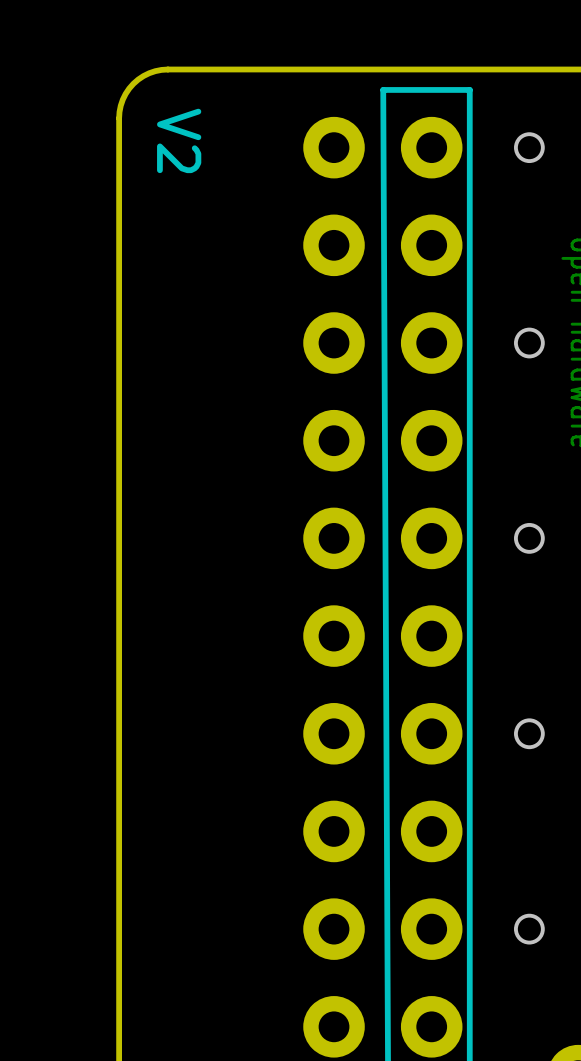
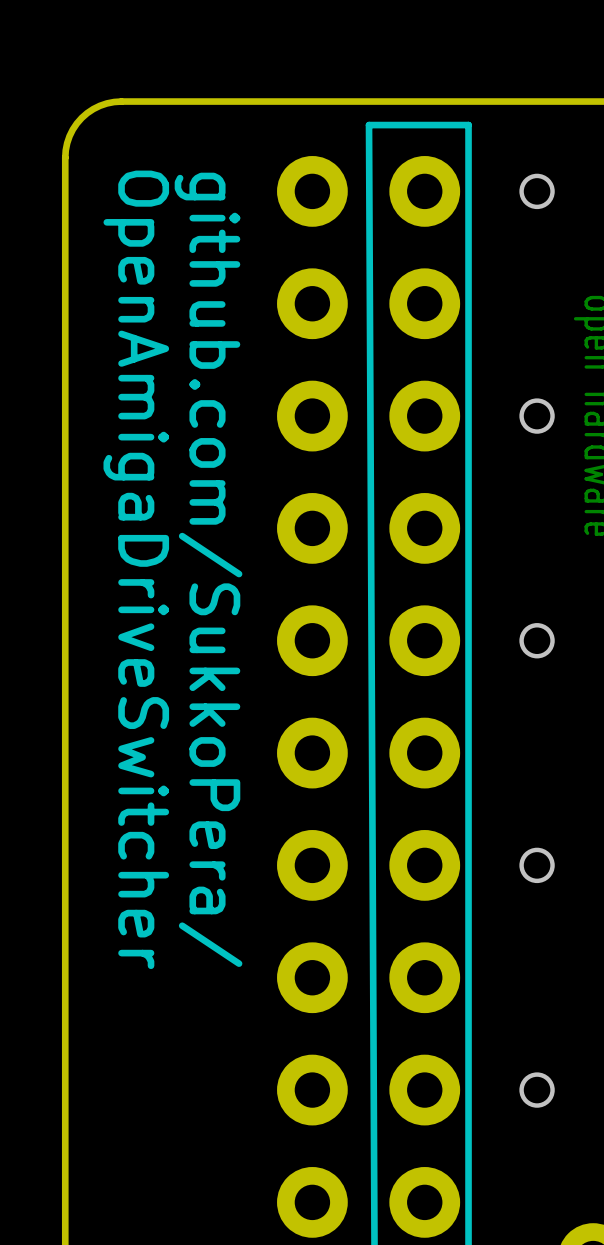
text: V2 (179, 140) -> none
text: none -> OpenAmigaDriveSwitcher (136, 569)
text: none -> github.com/SukkoPera/ (208, 569)

